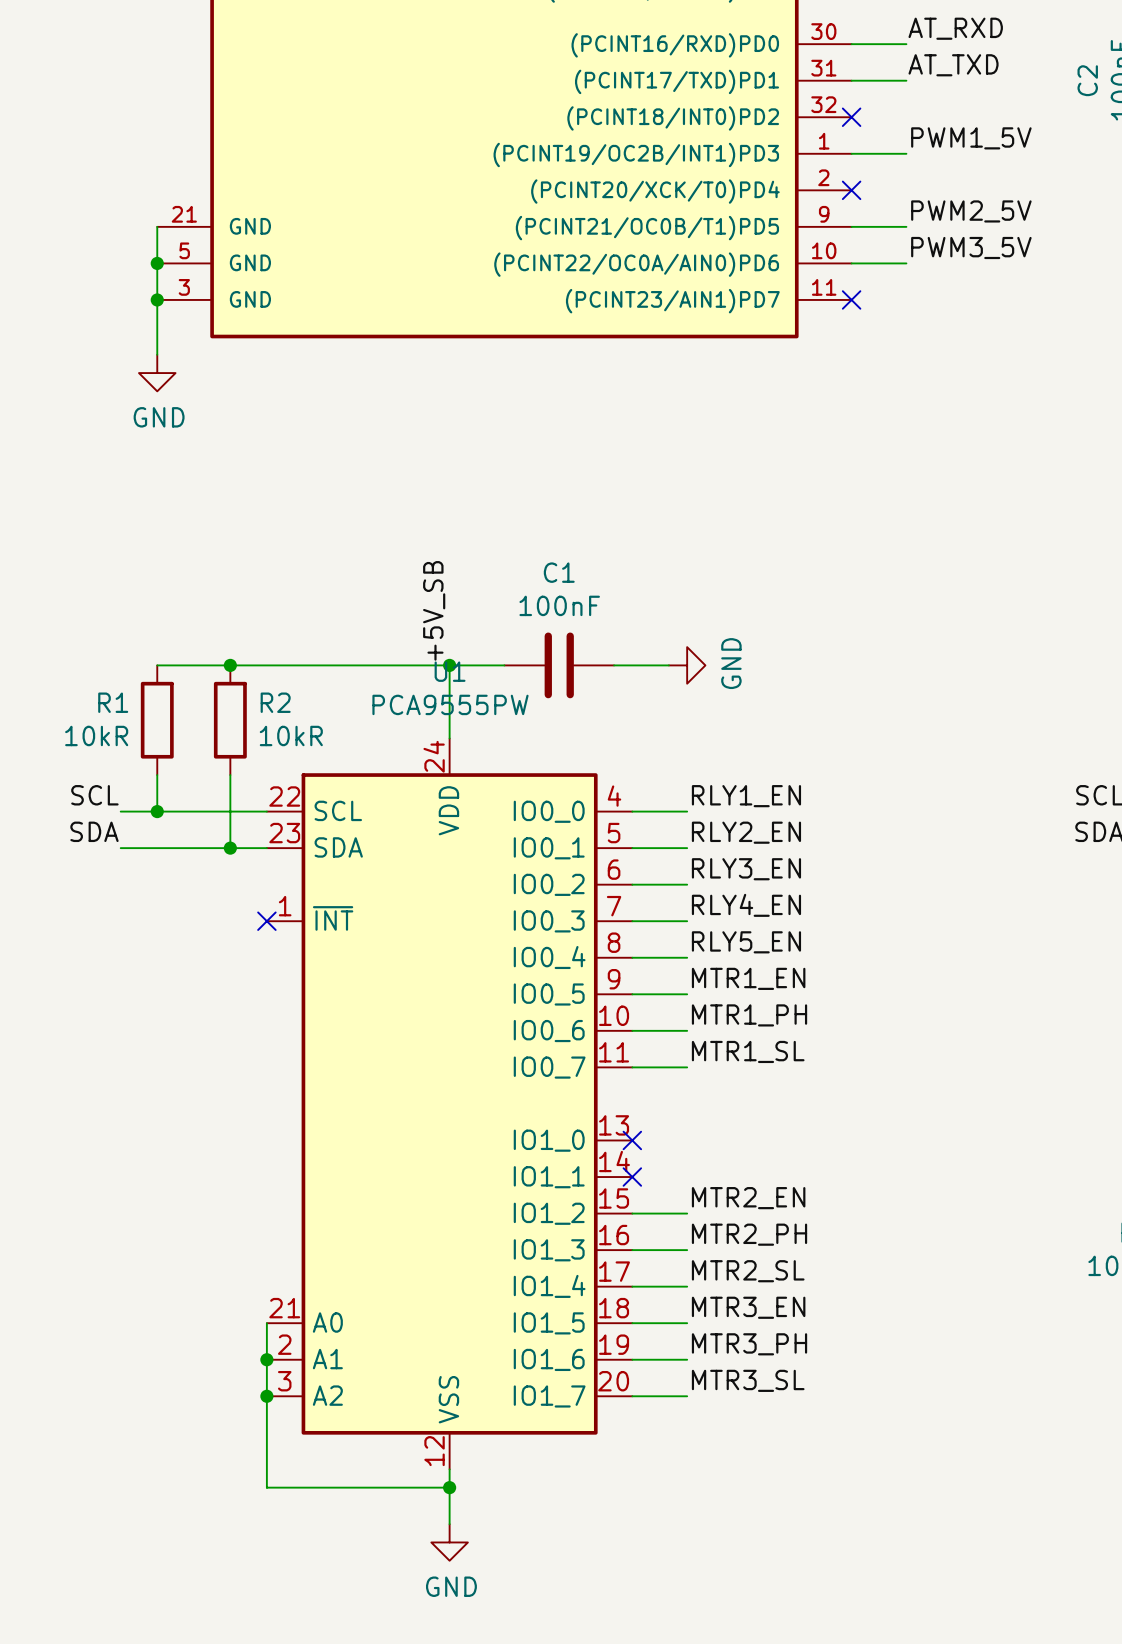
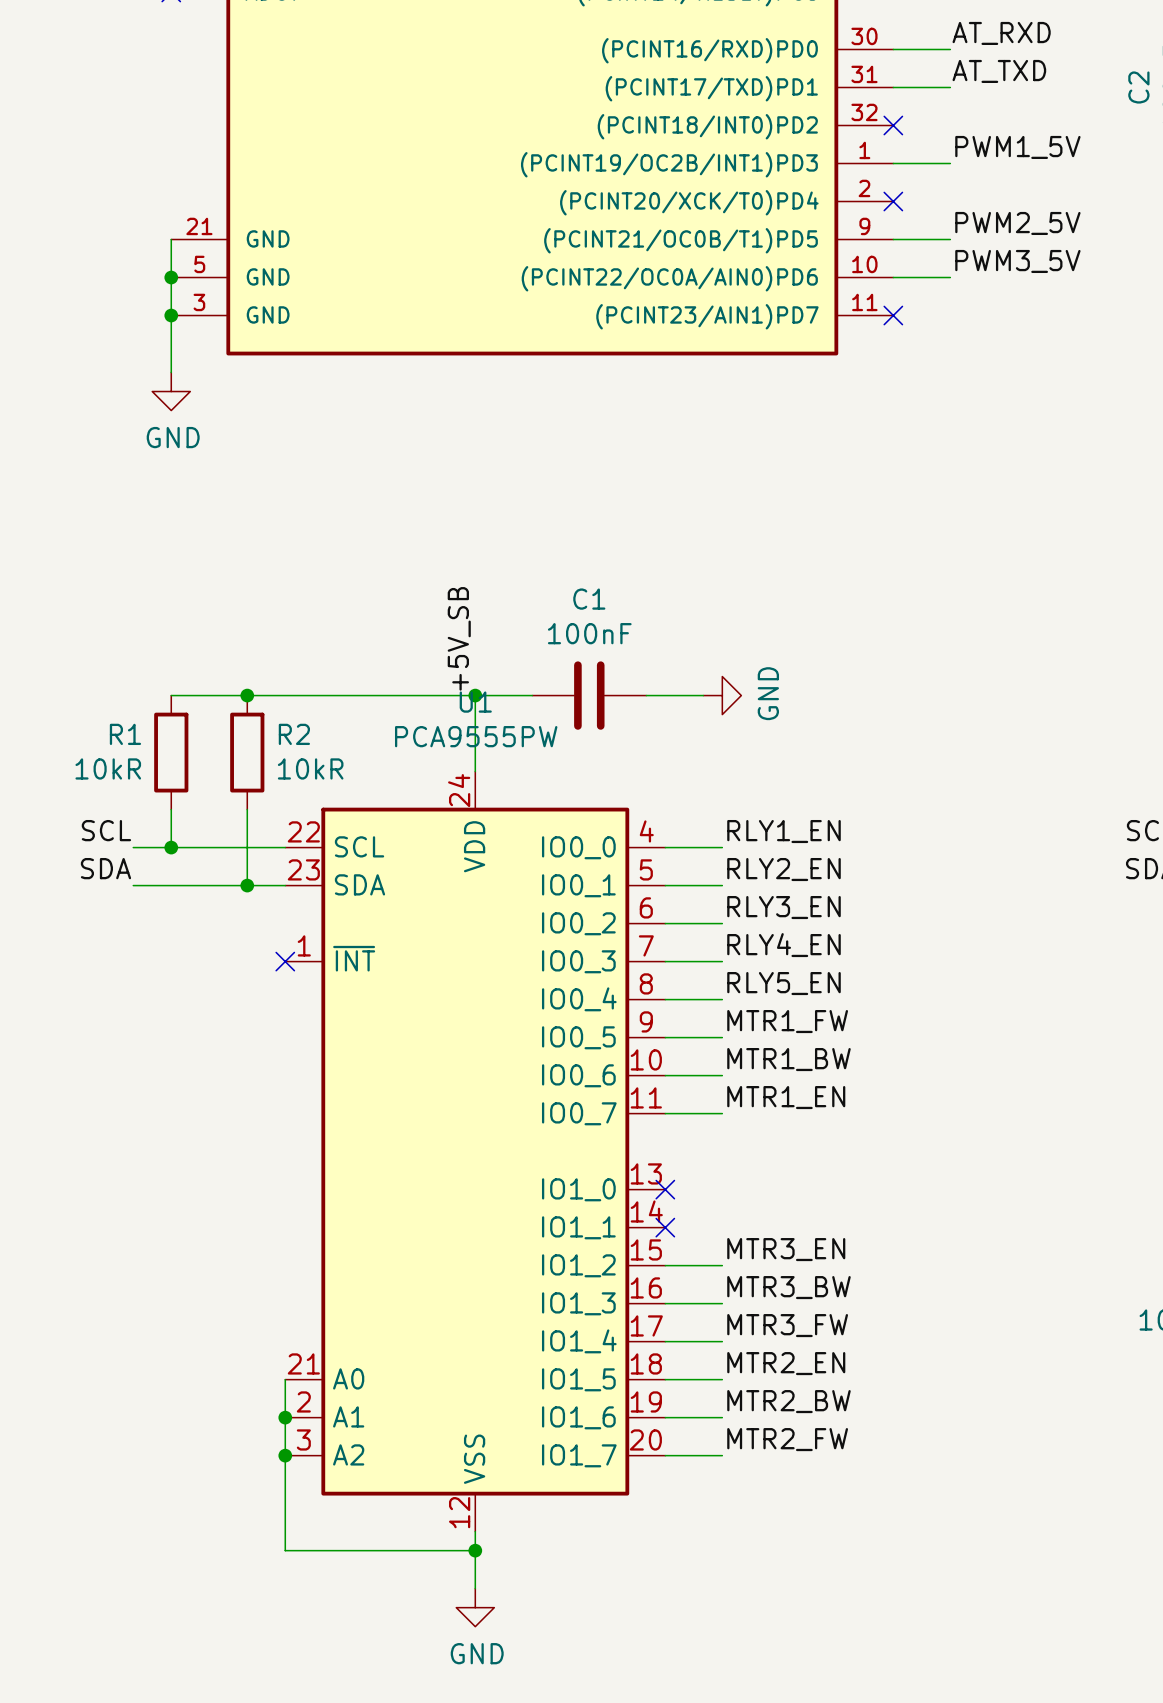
label: MTR1_EN (748, 978) -> MTR1_FW (787, 1021)
label: MTR1_PH (749, 1015) -> MTR1_BW (788, 1059)
label: MTR1_SL (748, 1051) -> MTR1_EN (786, 1097)
label: MTR2_EN (748, 1198) -> MTR3_EN (786, 1249)
label: MTR2_PH (749, 1234) -> MTR3_BW (788, 1287)
label: MTR2_SL (748, 1271) -> MTR3_FW (787, 1325)
label: MTR3_EN (748, 1307) -> MTR2_EN (786, 1363)
label: MTR3_PH (749, 1344) -> MTR2_BW (788, 1401)
label: MTR3_SL (748, 1380) -> MTR2_FW (787, 1439)

